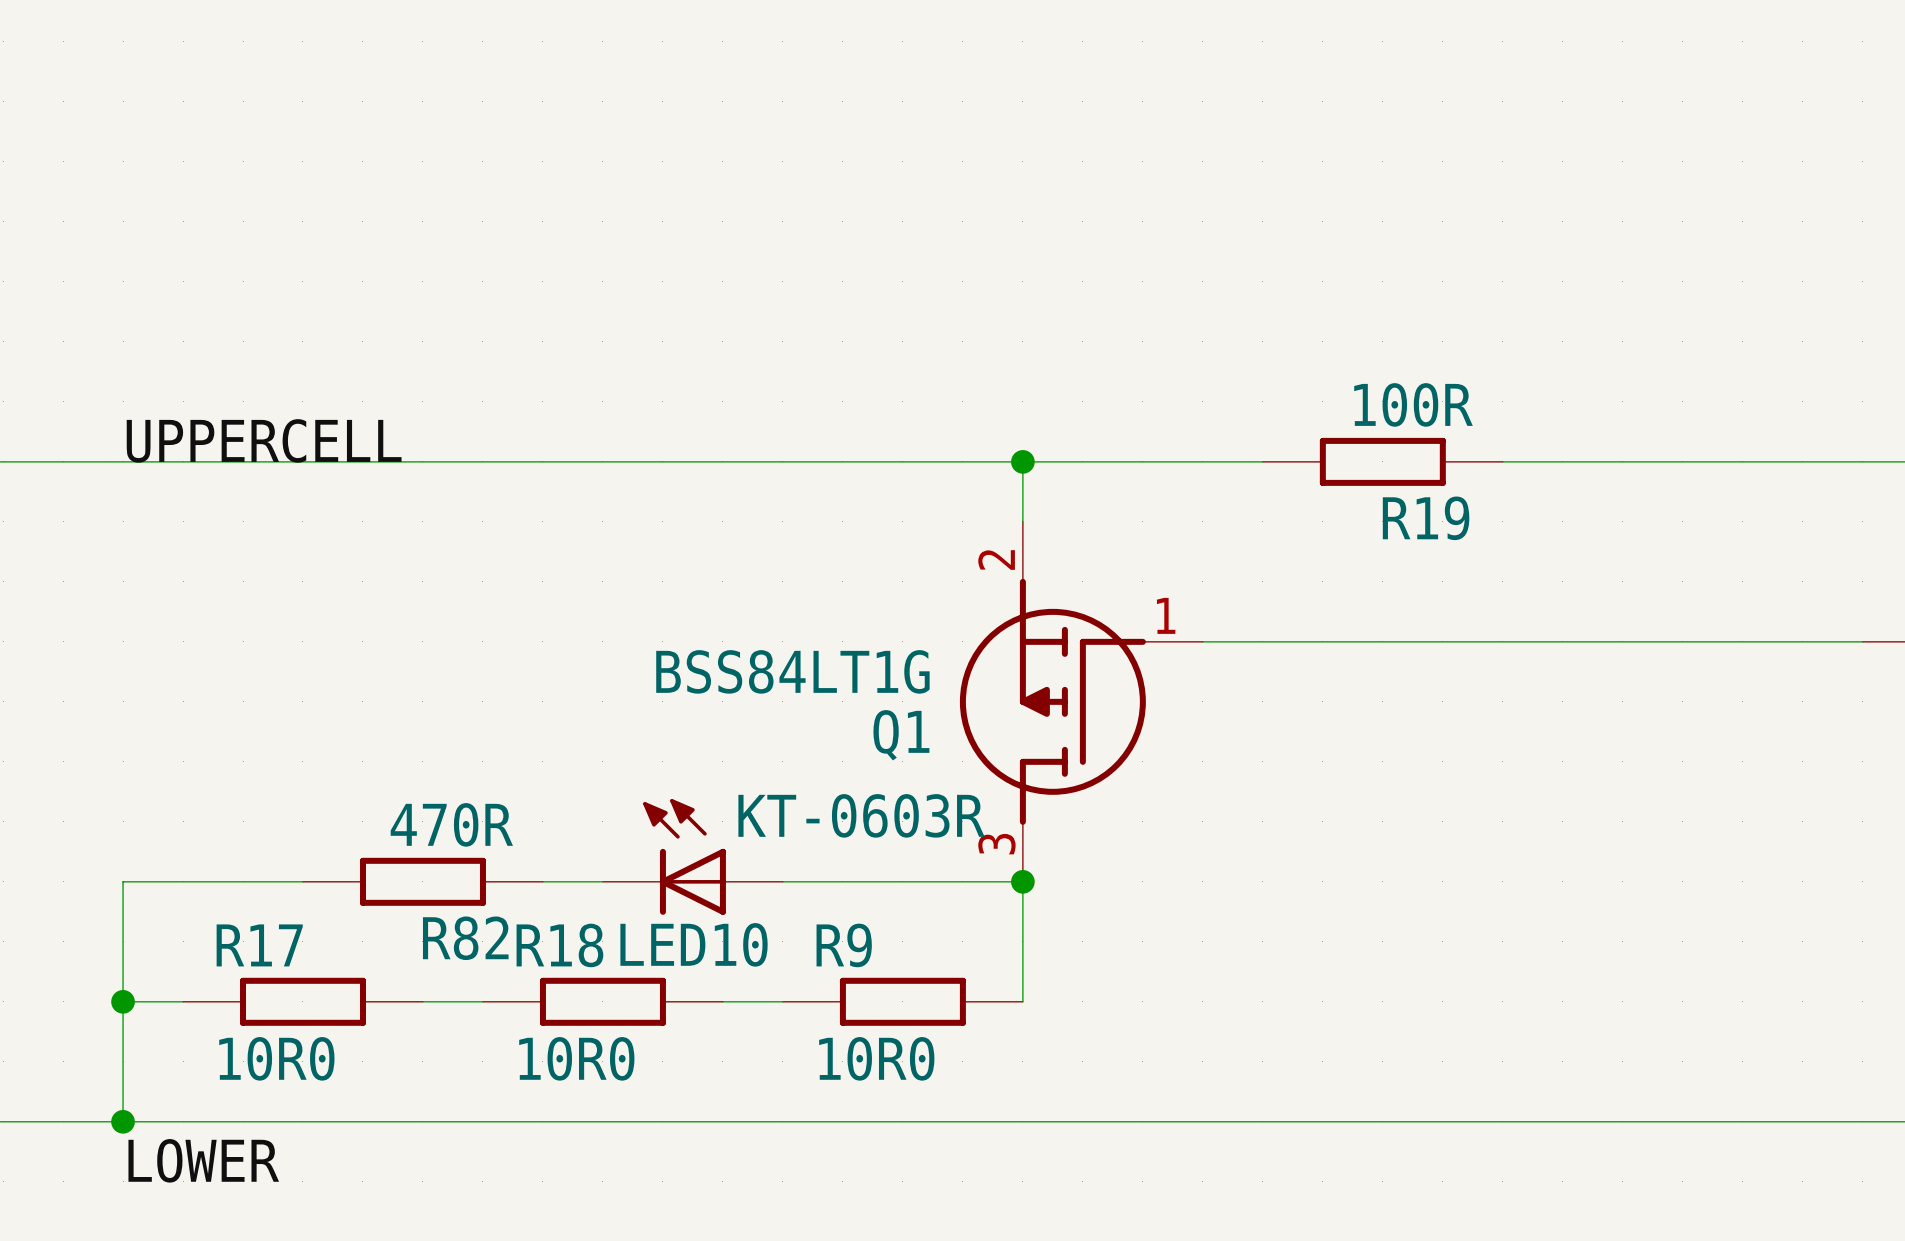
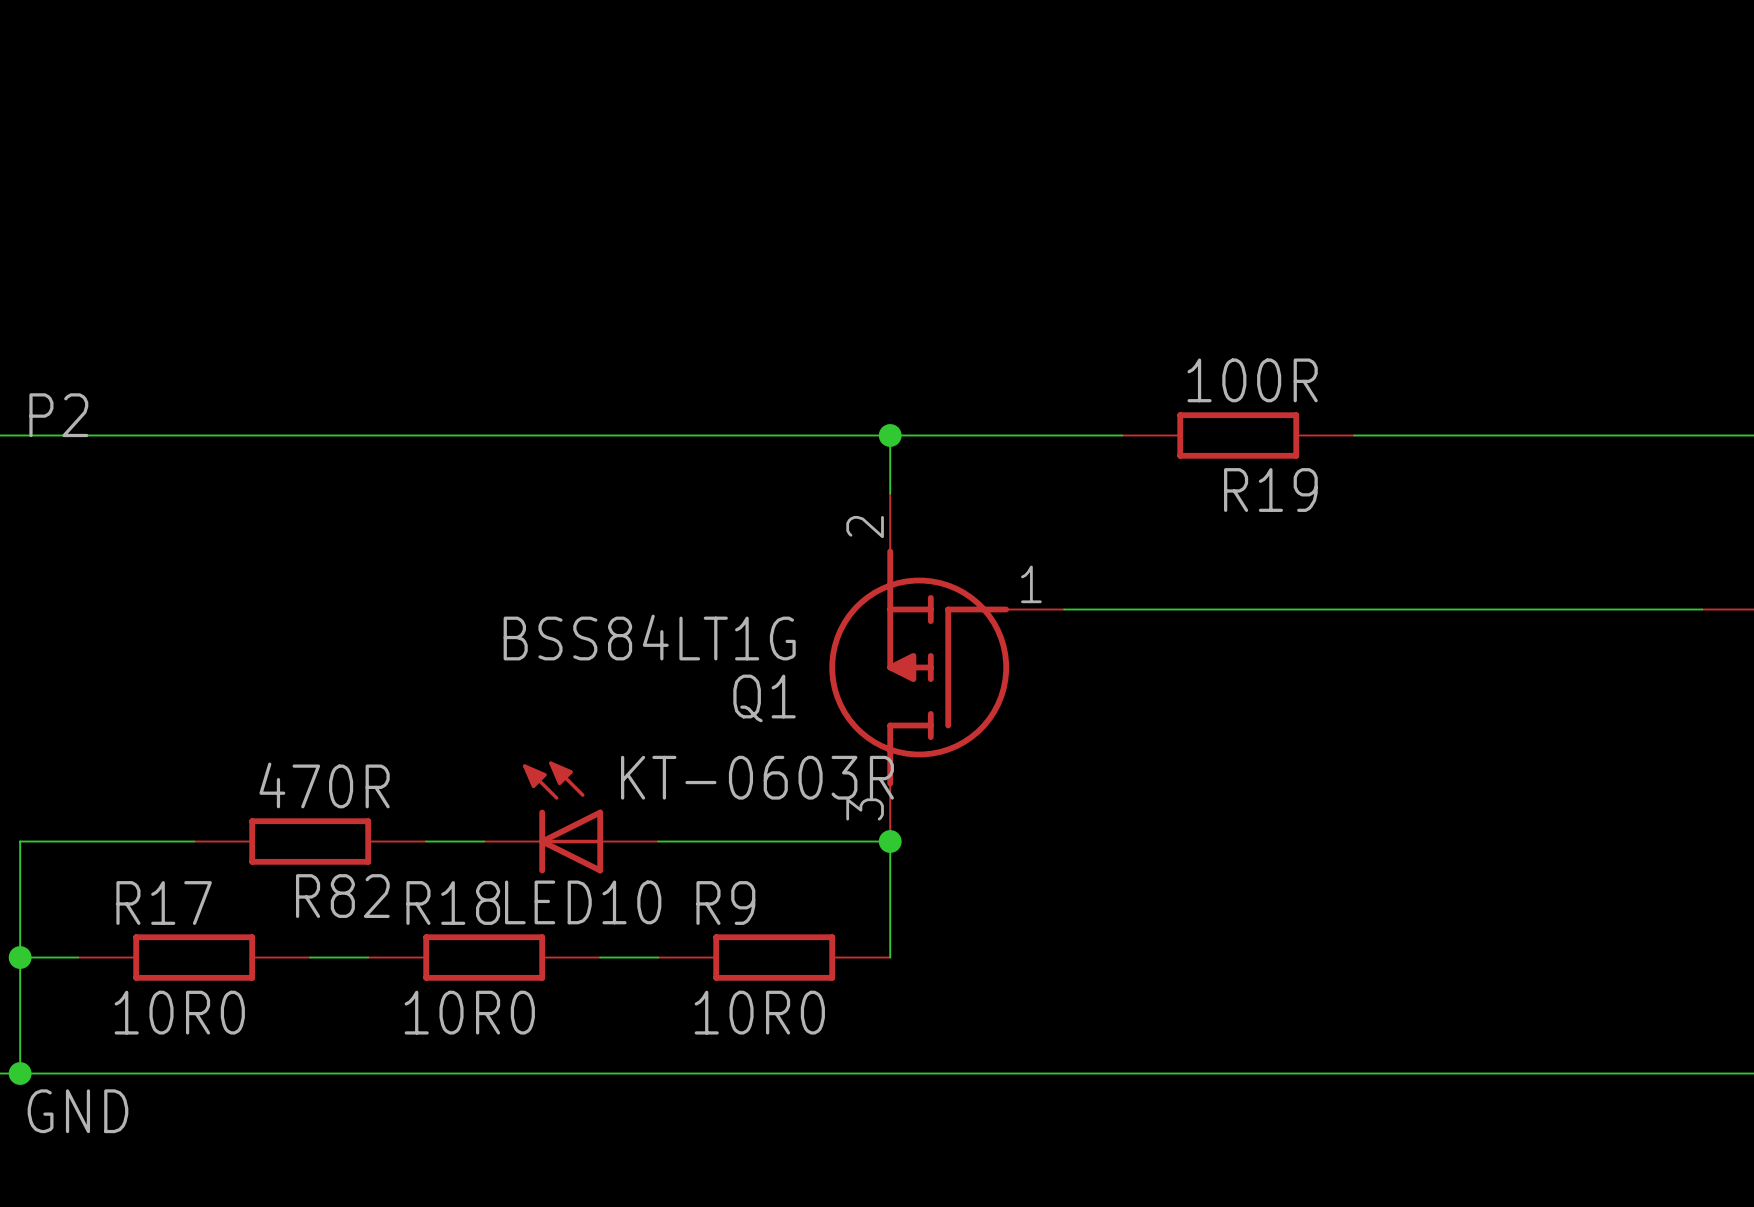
label: UPPERCELL (264, 440) -> P2 (58, 415)
label: LOWER (203, 1160) -> GND (77, 1111)

